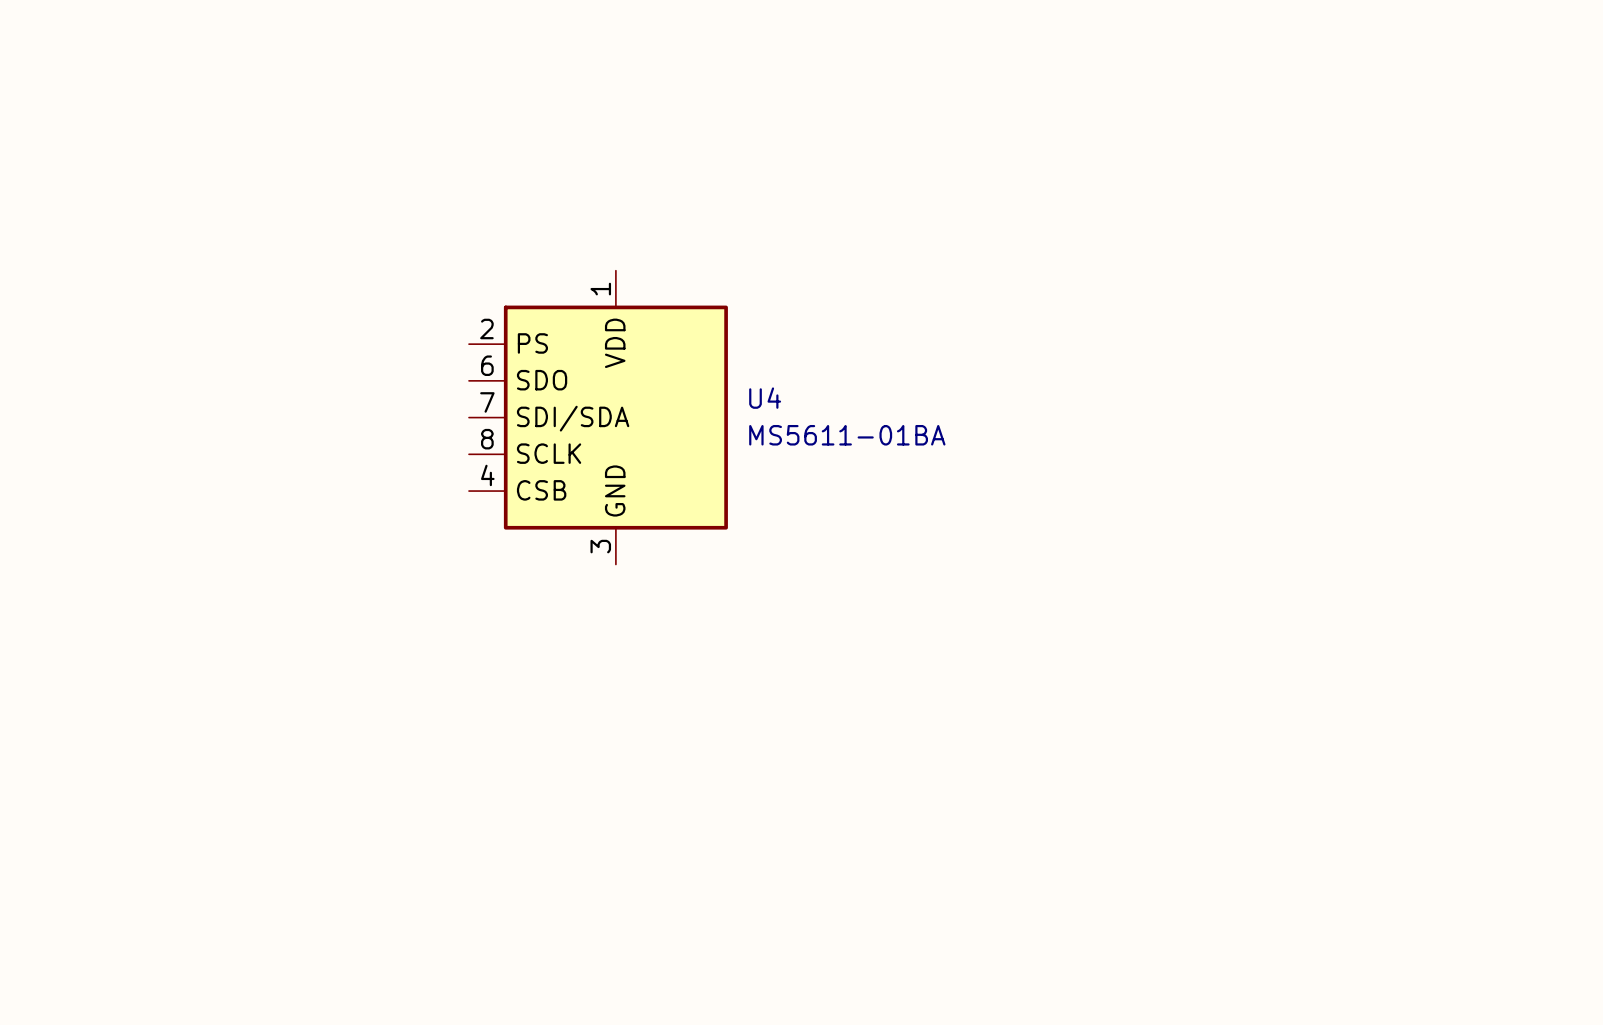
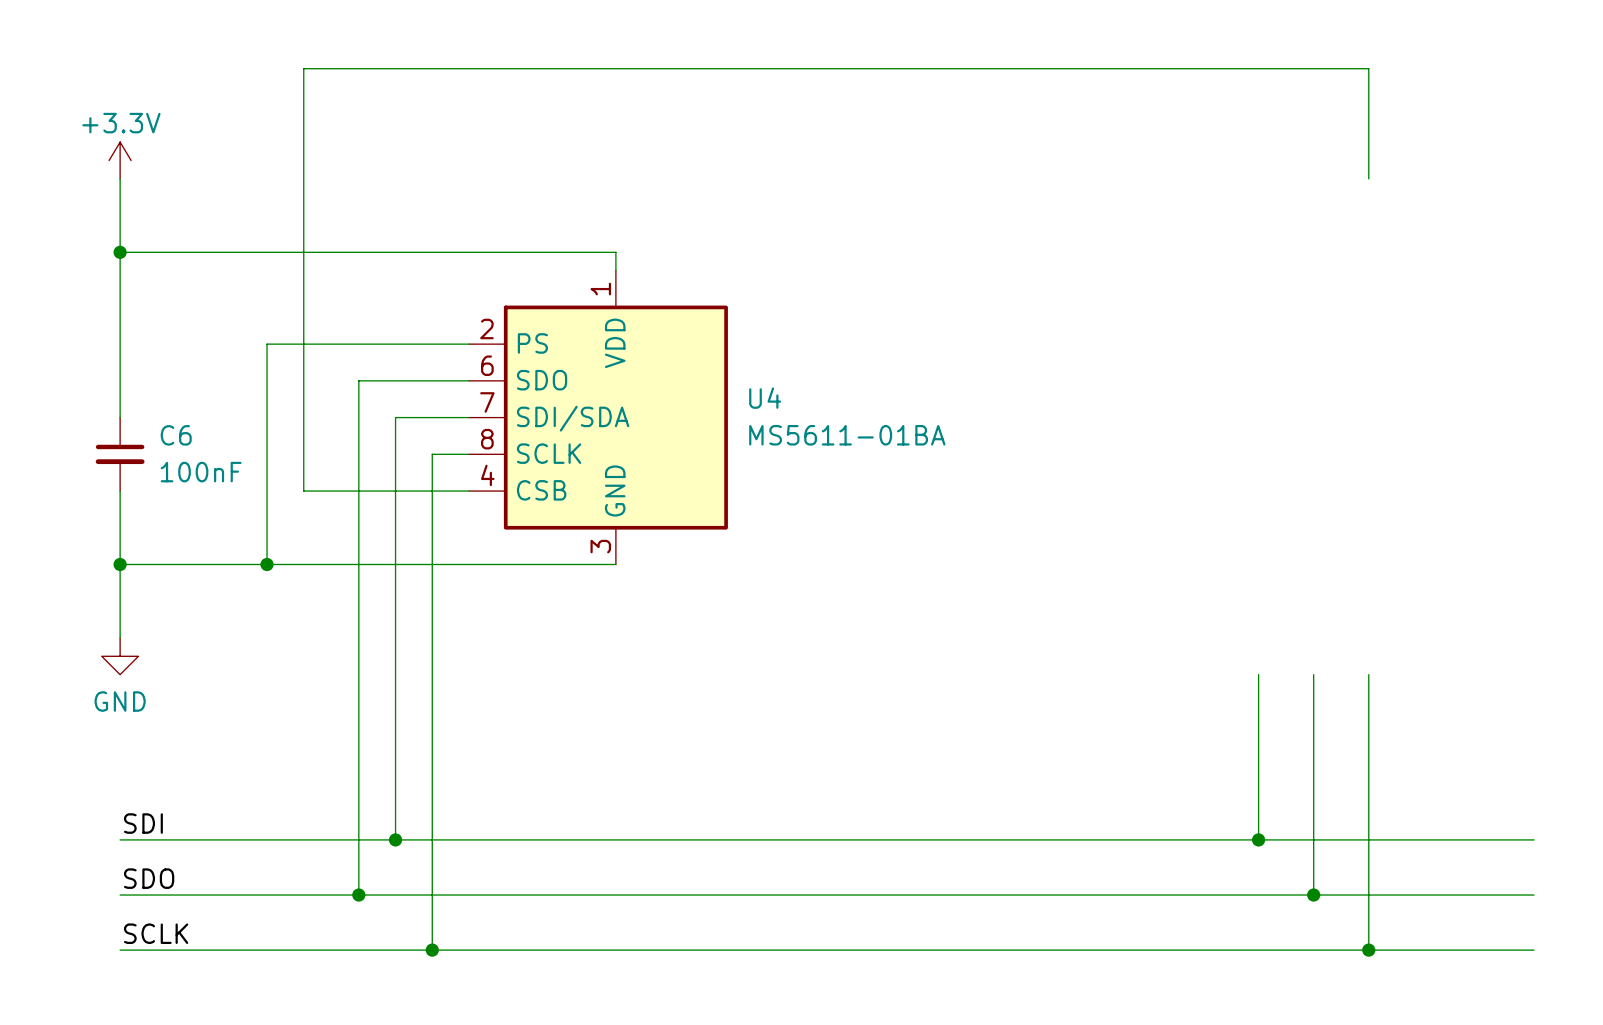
power symbol: none -> +3.3V (120, 160)
wire: none -> (120, 178) (120, 417)
wire: none -> (1368, 178) (1368, 68) (303, 68) (303, 491) (469, 491)
wire: none -> (120, 252) (615, 252) (615, 270)
junction: none -> (120, 252)
wire: none -> (469, 344) (267, 344) (267, 564)
wire: none -> (469, 380) (358, 380) (358, 895)
wire: none -> (469, 417) (395, 417) (395, 839)
C6: none -> 100nF (120, 454)
wire: none -> (469, 454) (432, 454) (432, 950)
wire: none -> (120, 491) (120, 637)
wire: none -> (120, 564) (615, 564)
junction: none -> (120, 564)
junction: none -> (267, 564)
power symbol: none -> GND (120, 656)
wire: none -> (1258, 674) (1258, 839)
wire: none -> (1313, 674) (1313, 895)
wire: none -> (1368, 674) (1368, 950)
label: none -> SDI (143, 823)
wire: none -> (120, 839) (1534, 839)
junction: none -> (395, 839)
junction: none -> (1258, 839)
label: none -> SDO (149, 878)
wire: none -> (120, 895) (1534, 895)
junction: none -> (358, 895)
junction: none -> (1313, 895)
label: none -> SCLK (156, 933)
wire: none -> (120, 950) (1534, 950)
junction: none -> (432, 950)
junction: none -> (1368, 950)

